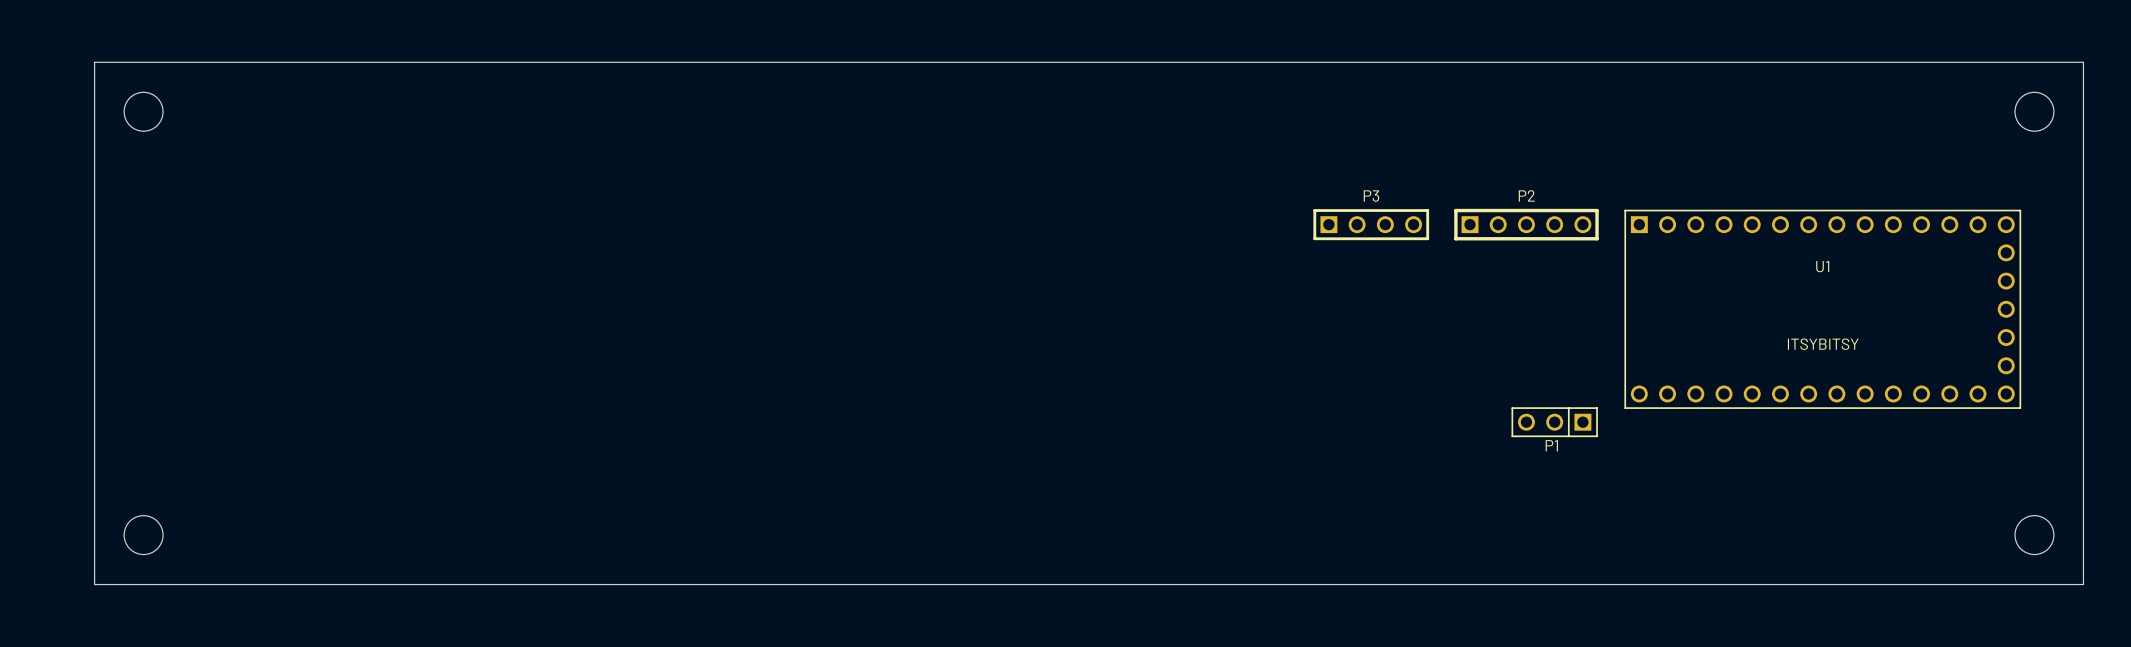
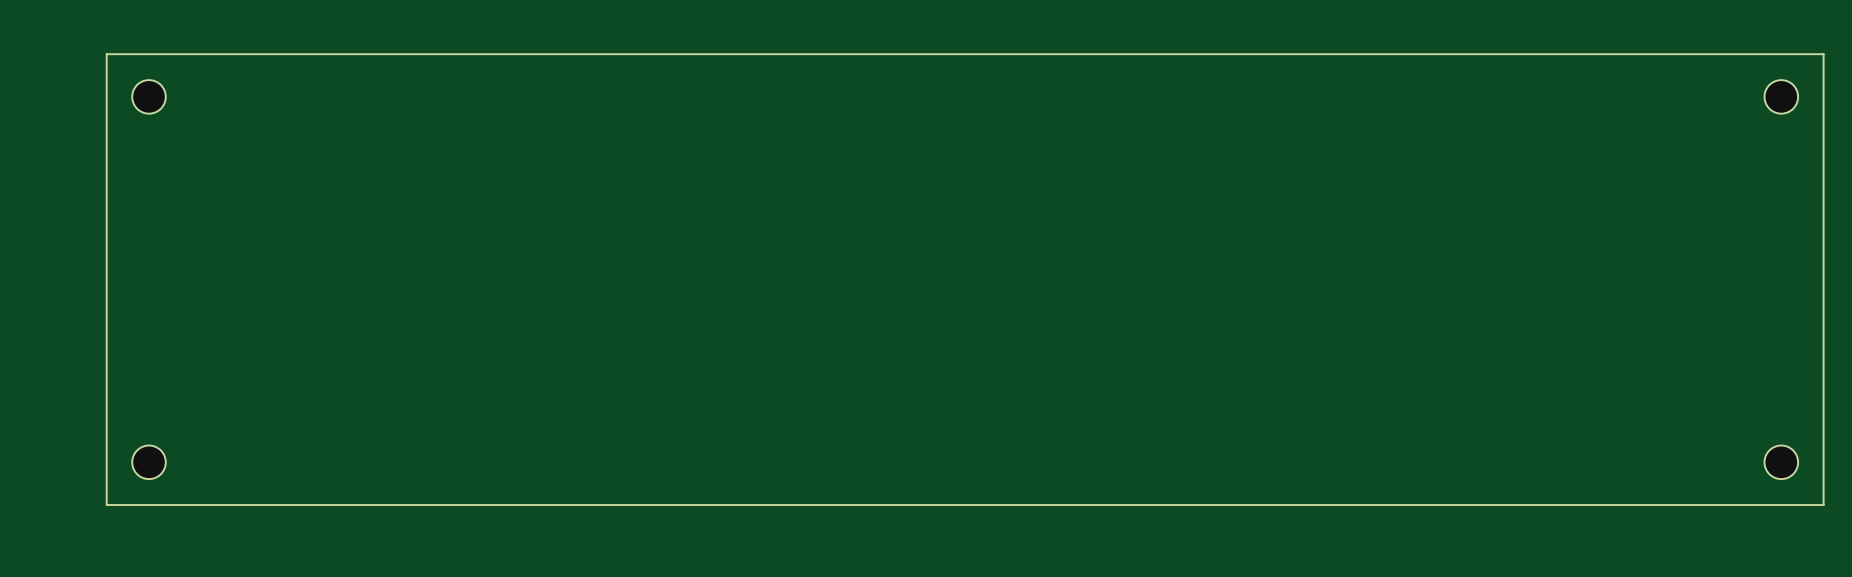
P3: (1371, 224) -> none
P2: (1526, 224) -> none
U1: ITSYBITSY (1822, 309) -> none
P1: (1554, 422) -> none

